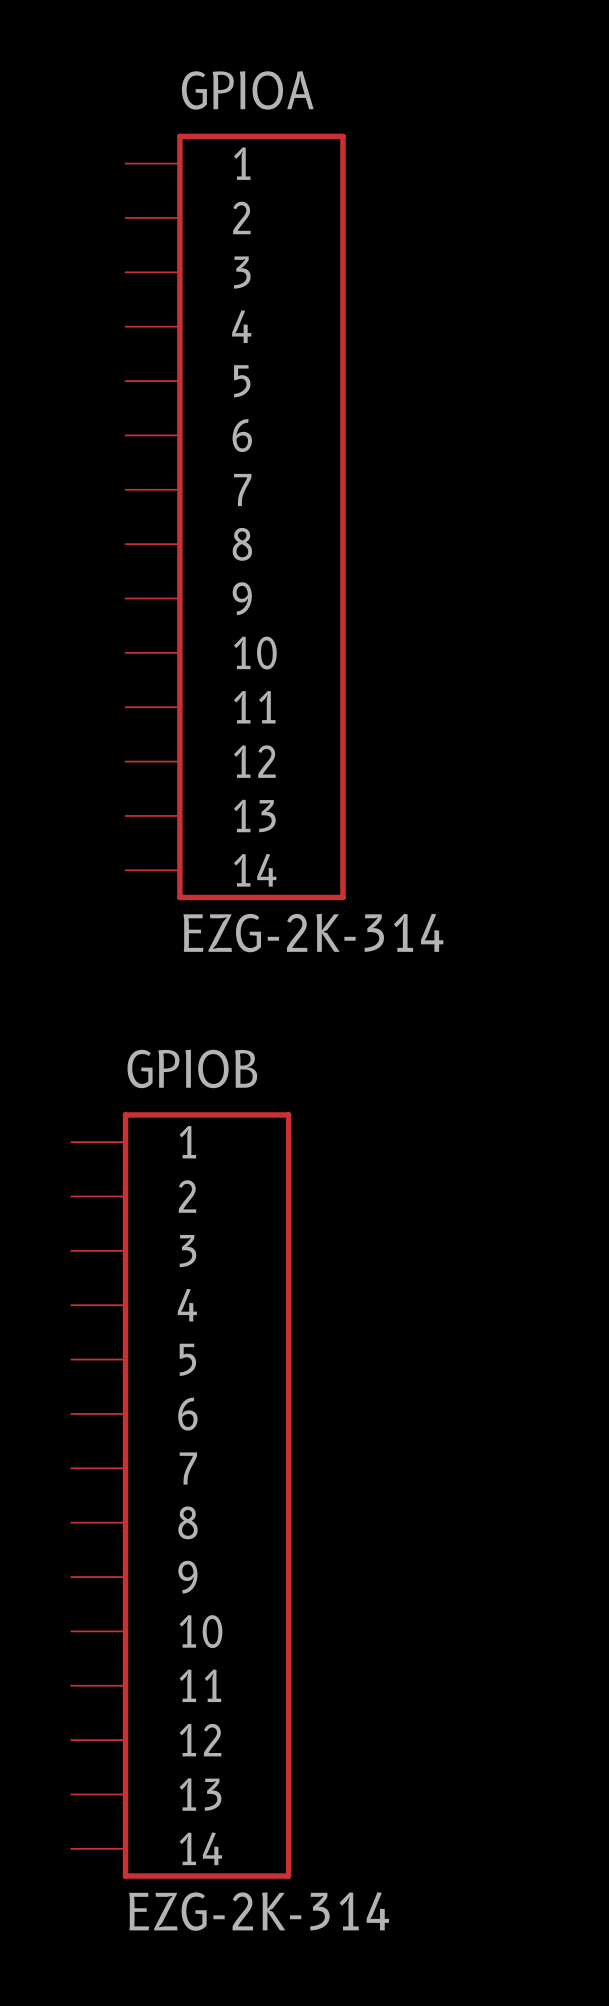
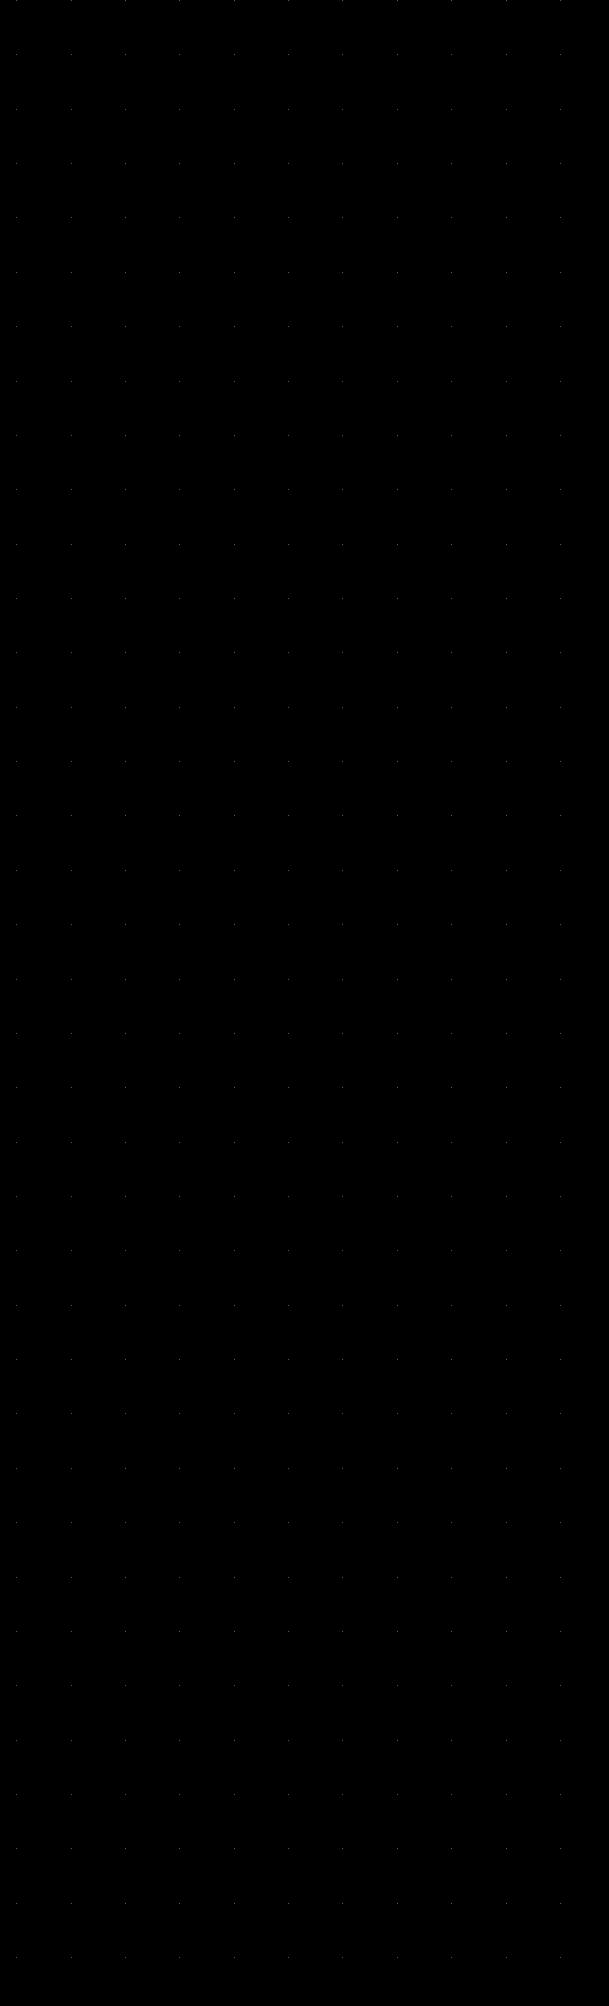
GPIOA: EZG-2K-314 (235, 516) -> none
GPIOB: EZG-2K-314 (181, 1495) -> none

